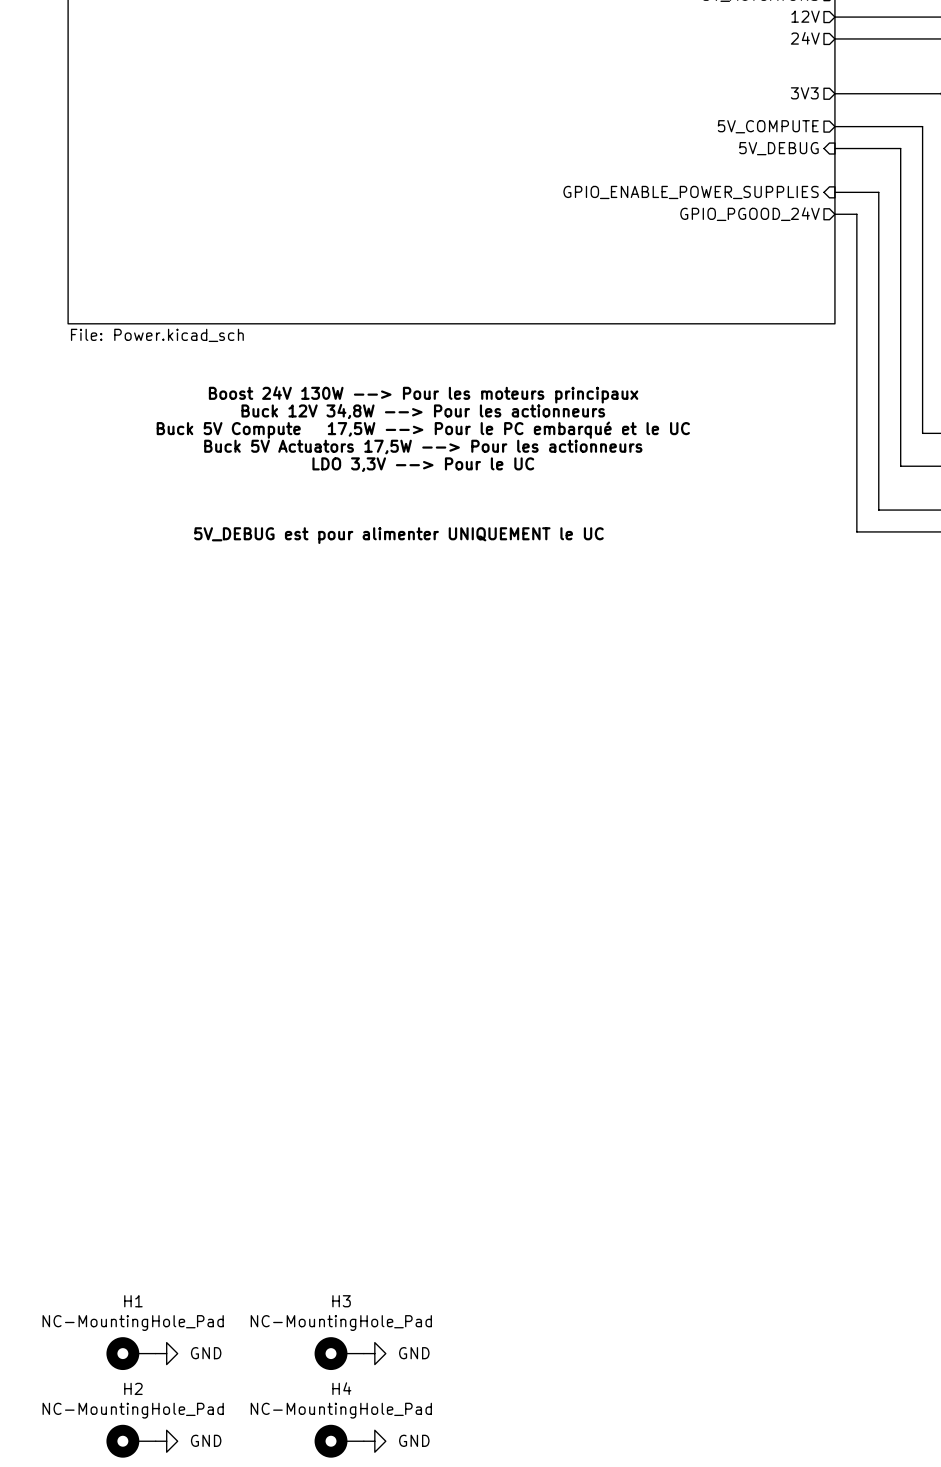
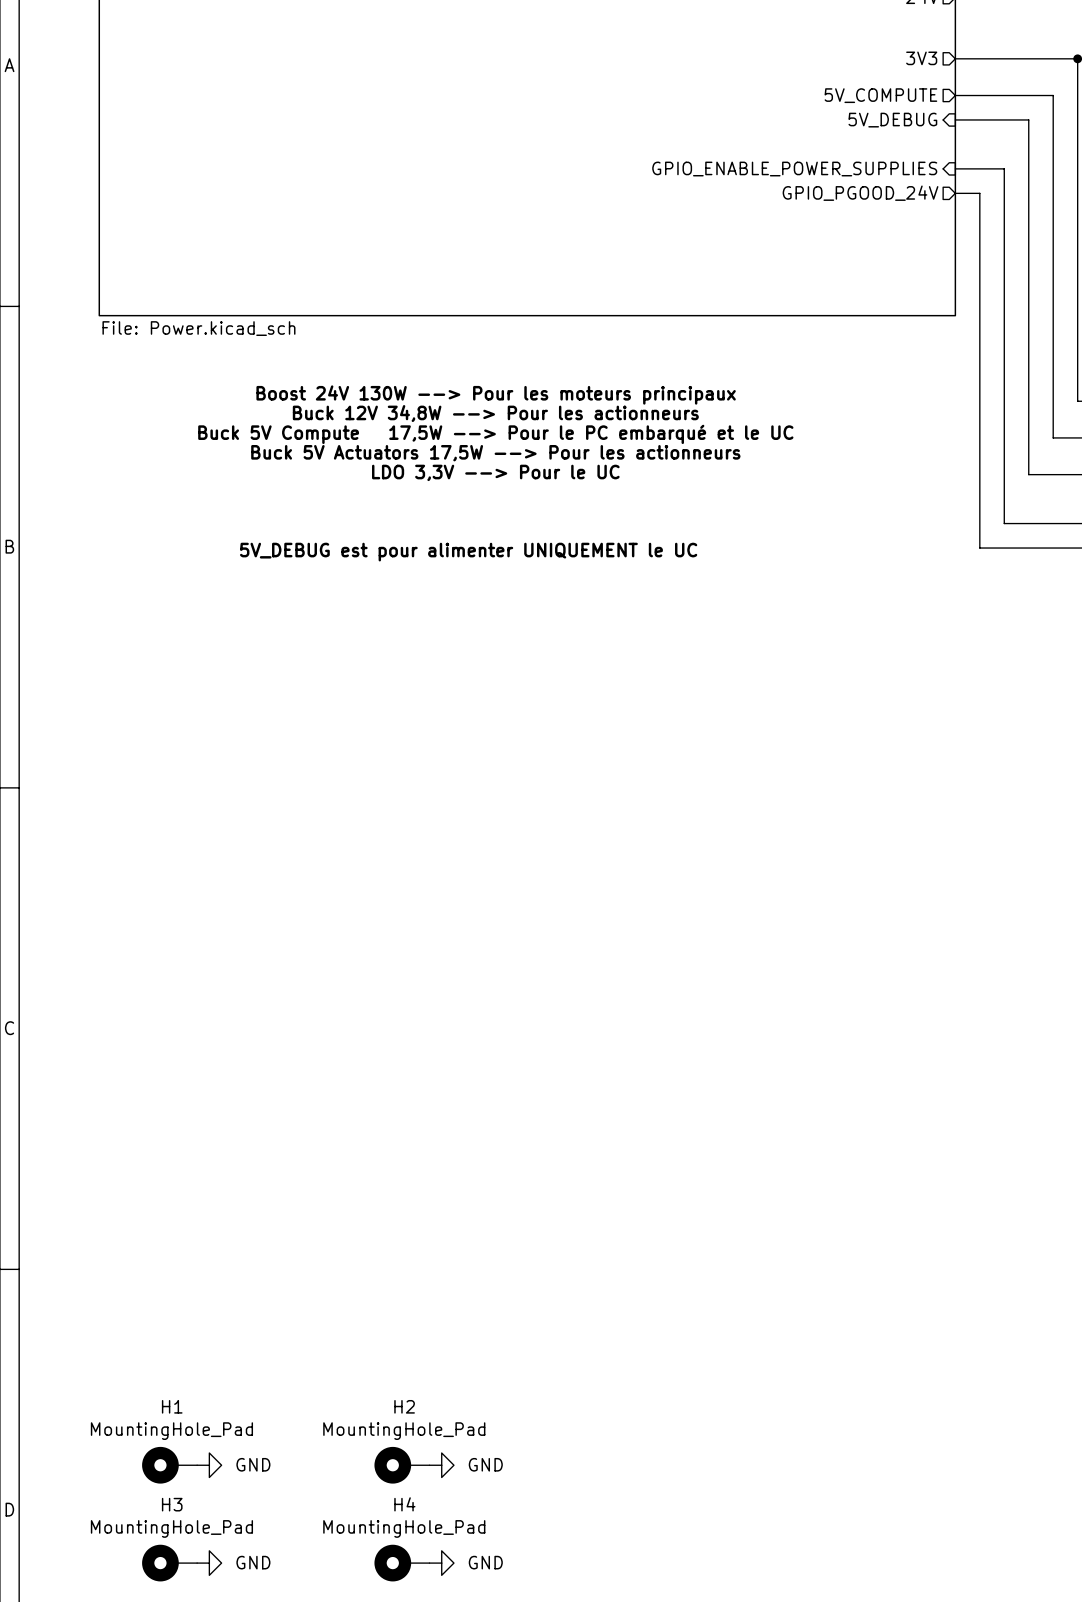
H3 name: H3 (341, 1301) -> H2 (404, 1406)
H1 value: NC-MountingHole_Pad (133, 1323) -> MountingHole_Pad (171, 1431)
H3 value: NC-MountingHole_Pad (341, 1323) -> MountingHole_Pad (404, 1431)
H2 name: H2 (133, 1388) -> H3 (172, 1504)
H2 value: NC-MountingHole_Pad (133, 1410) -> MountingHole_Pad (171, 1528)
H4 value: NC-MountingHole_Pad (341, 1410) -> MountingHole_Pad (404, 1528)

